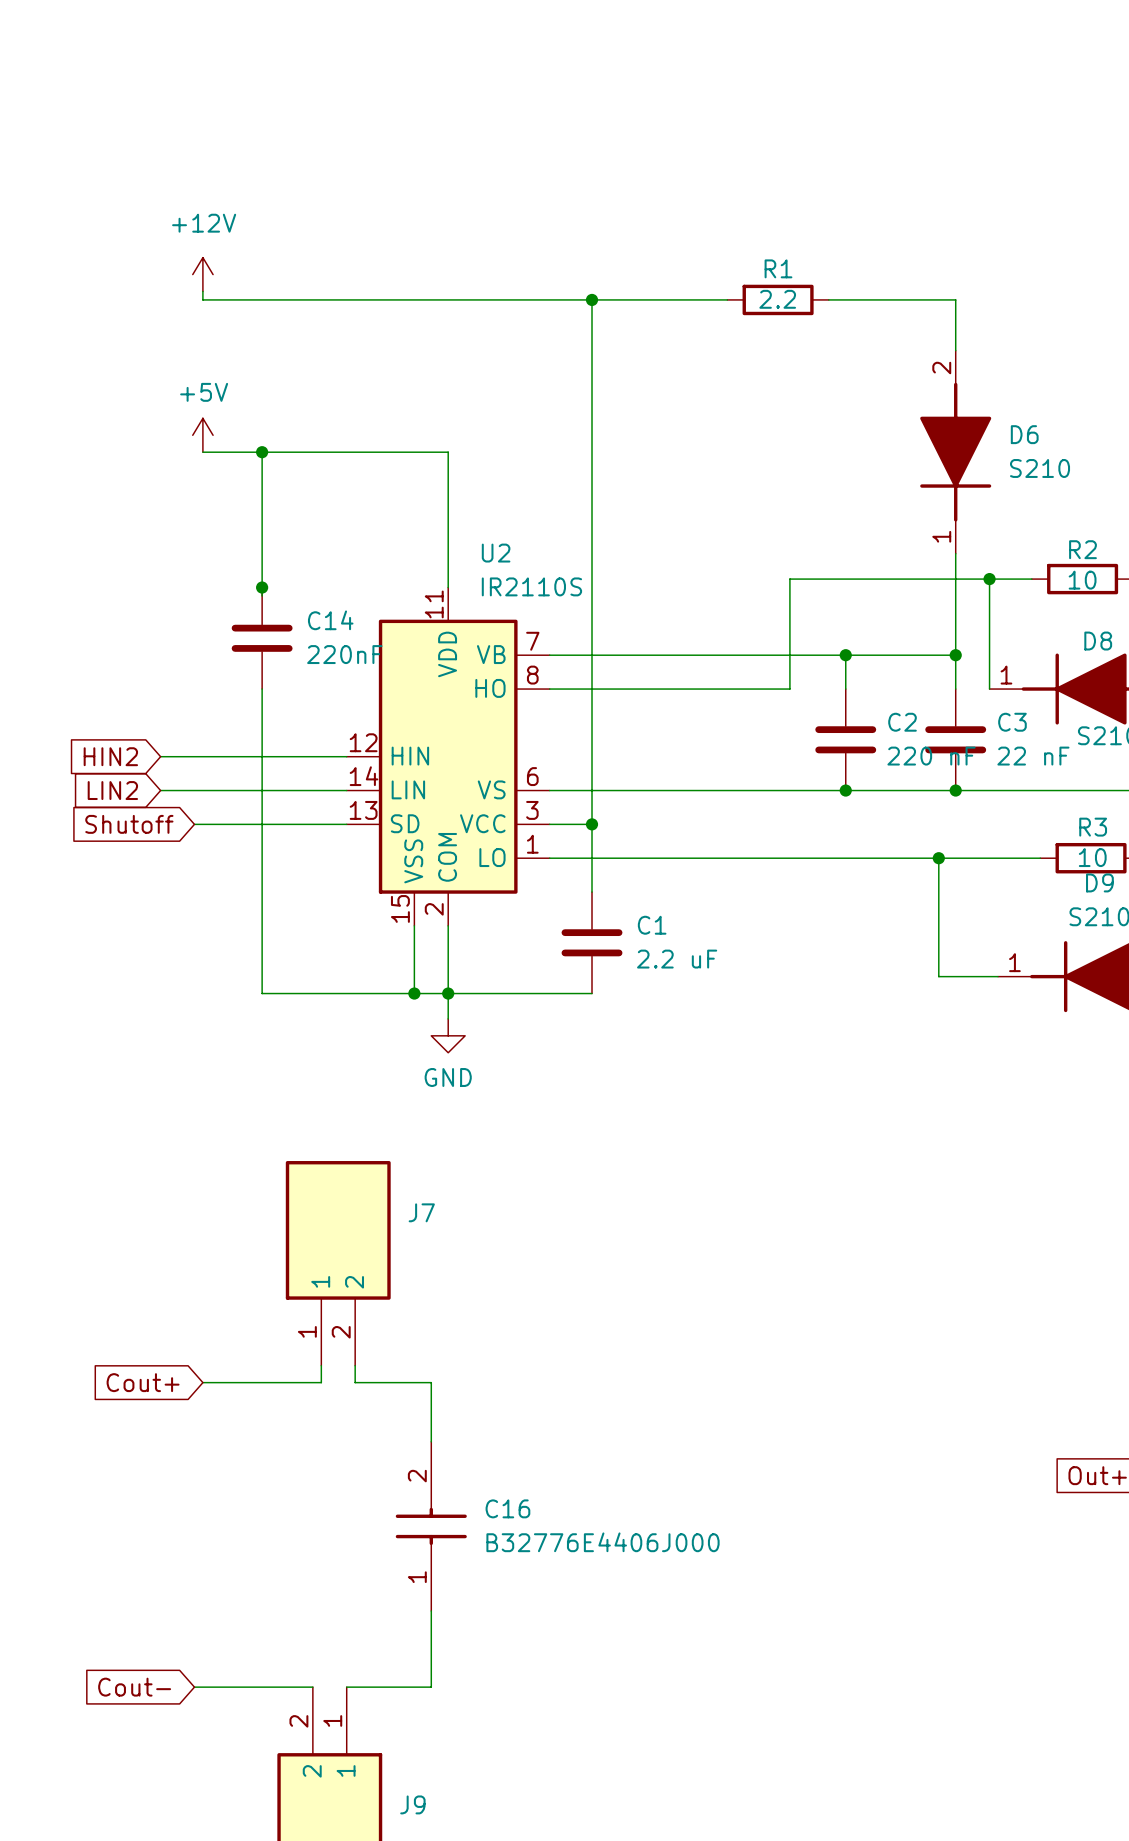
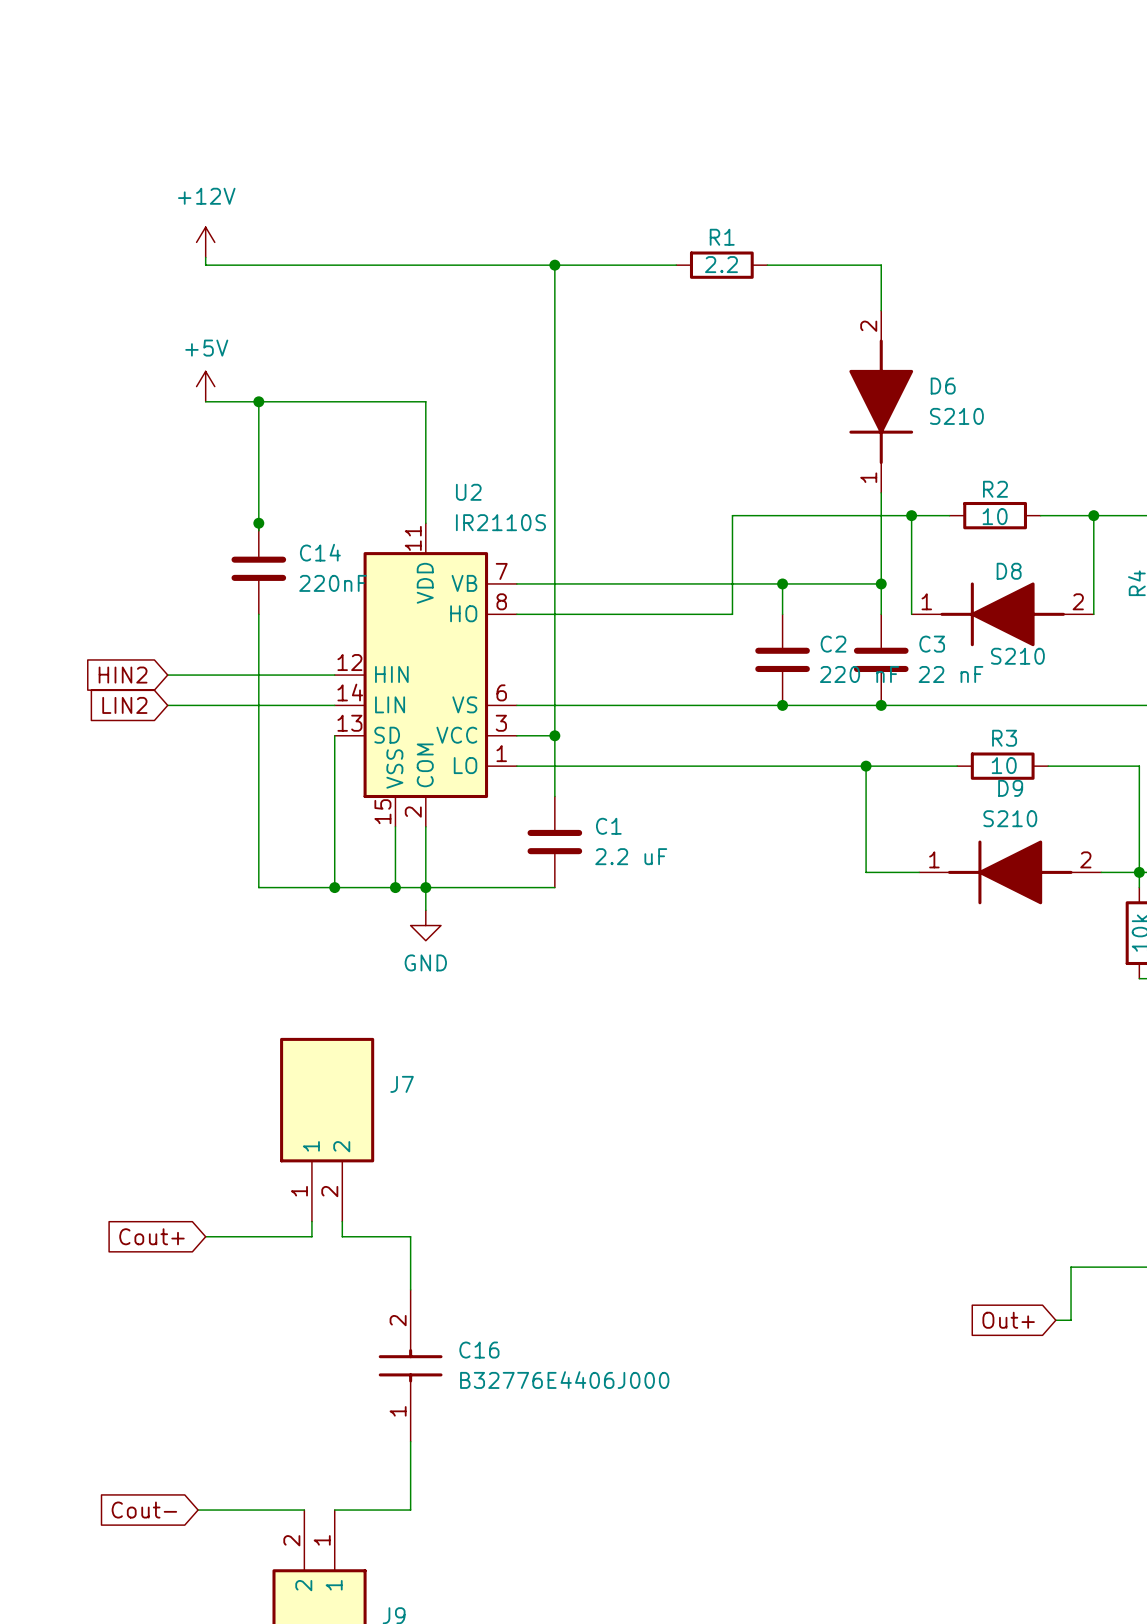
global label: Shutoff (129, 824) -> none
wire: (194, 824) (346, 824) -> (334, 887) (334, 735)
junction: none -> (334, 887)

